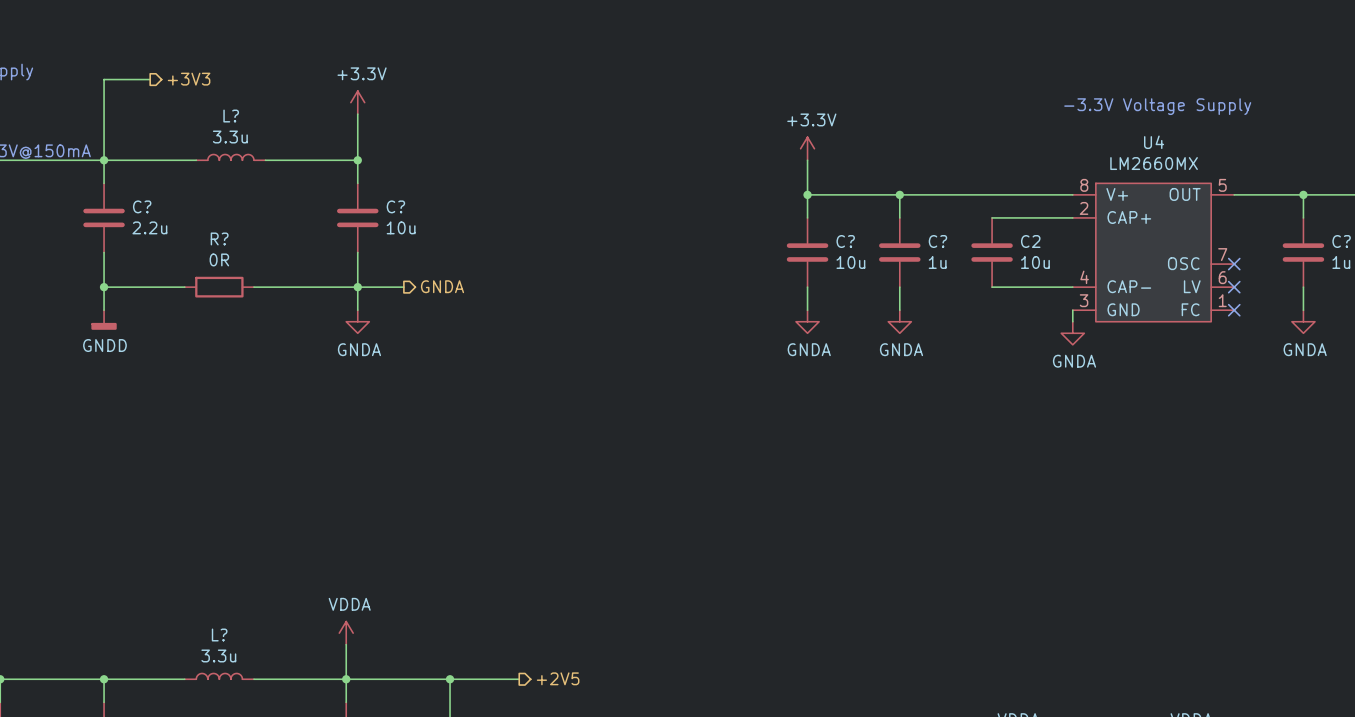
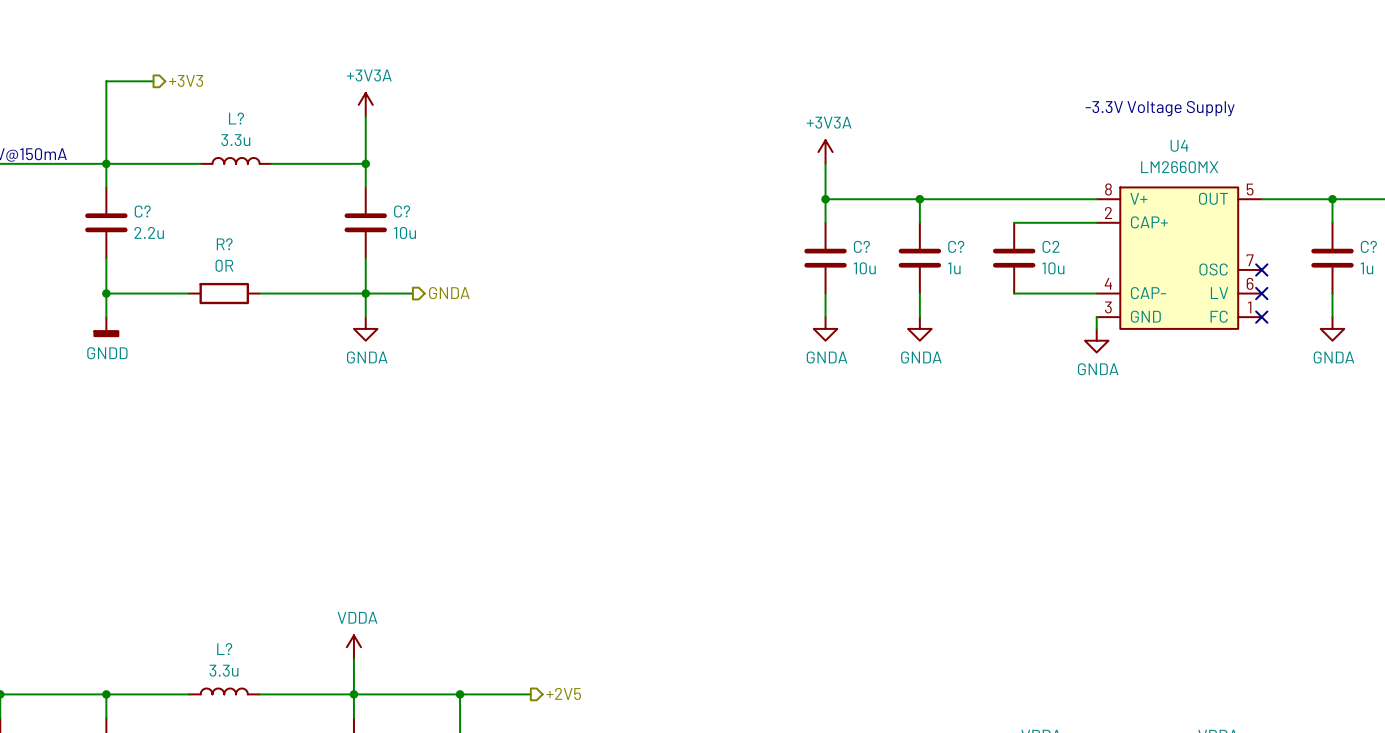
power symbol: +3.3V (357, 102) -> +3V3A (365, 104)
power symbol: +3.3V (807, 148) -> +3V3A (825, 152)

